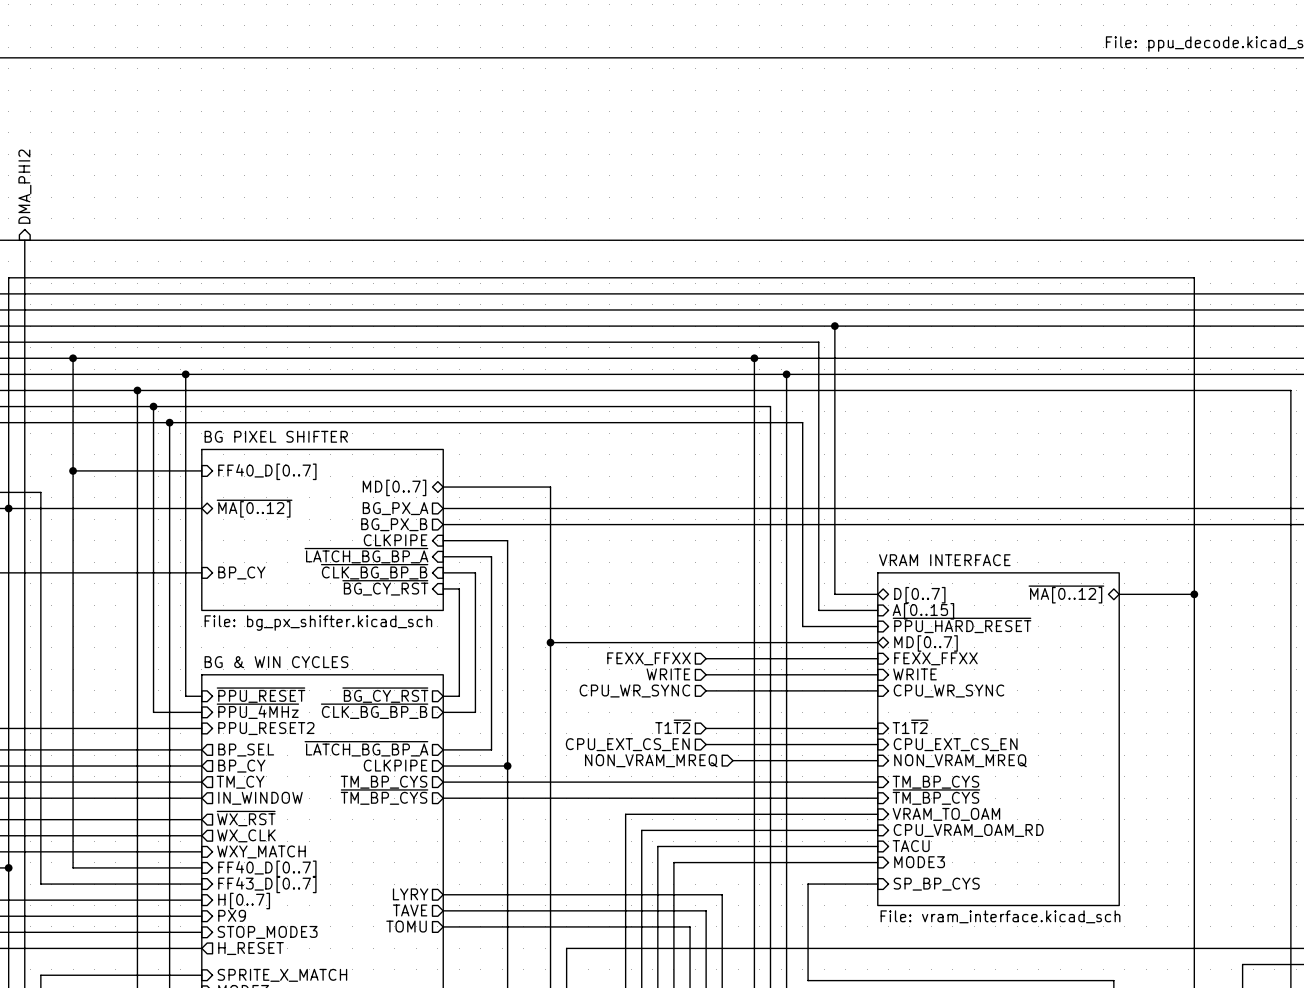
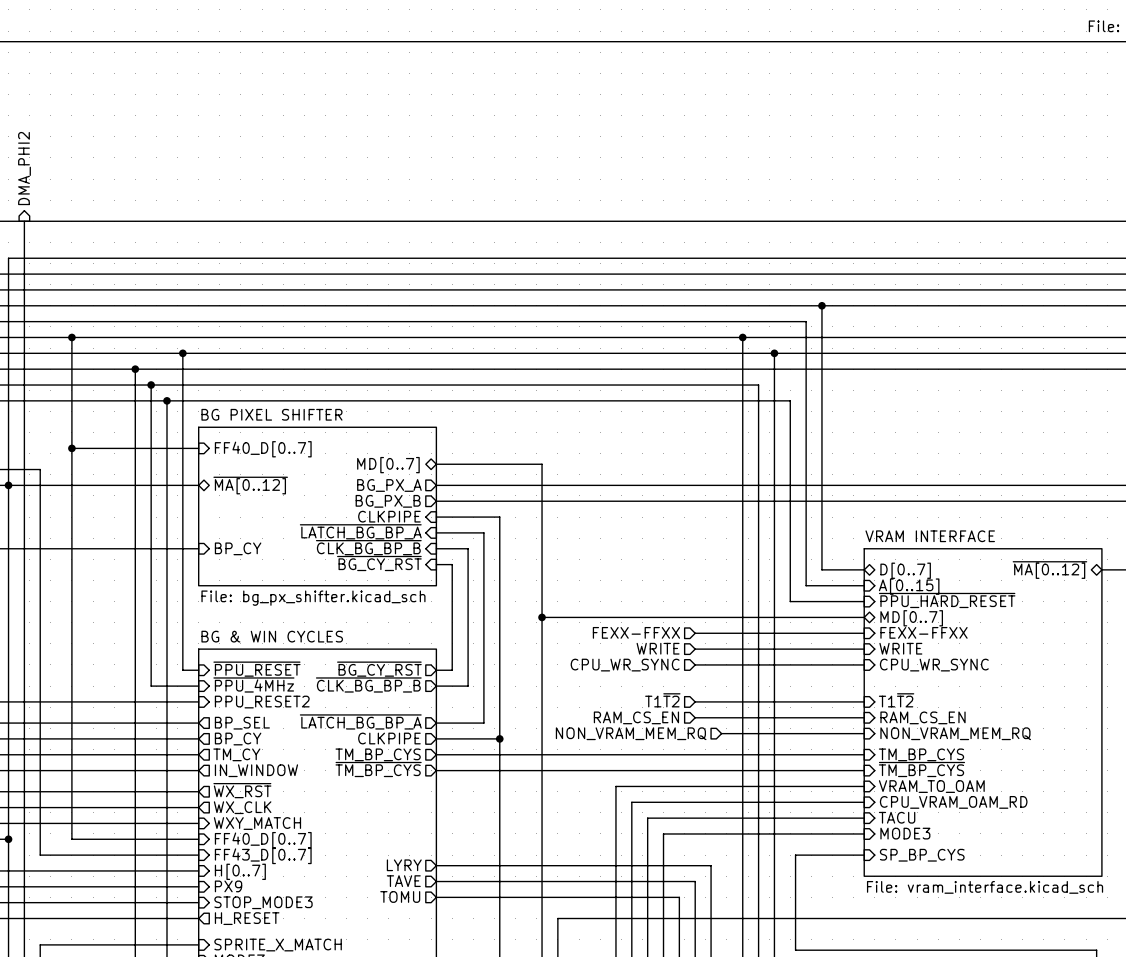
hierarchical label: FEXX_FFXX (648, 658) -> FEXX-FFXX (636, 632)
sheet pin: FEXX_FFXX (935, 658) -> FEXX-FFXX (924, 632)
hierarchical label: CPU_EXT_CS_EN (627, 744) -> RAM_CS_EN (636, 717)
sheet pin: CPU_EXT_CS_EN (955, 744) -> RAM_CS_EN (923, 717)
hierarchical label: NON_VRAM_MREQ (651, 760) -> NON_VRAM_MEM_RQ (631, 733)
sheet pin: NON_VRAM_MREQ (960, 760) -> NON_VRAM_MEM_RQ (955, 733)

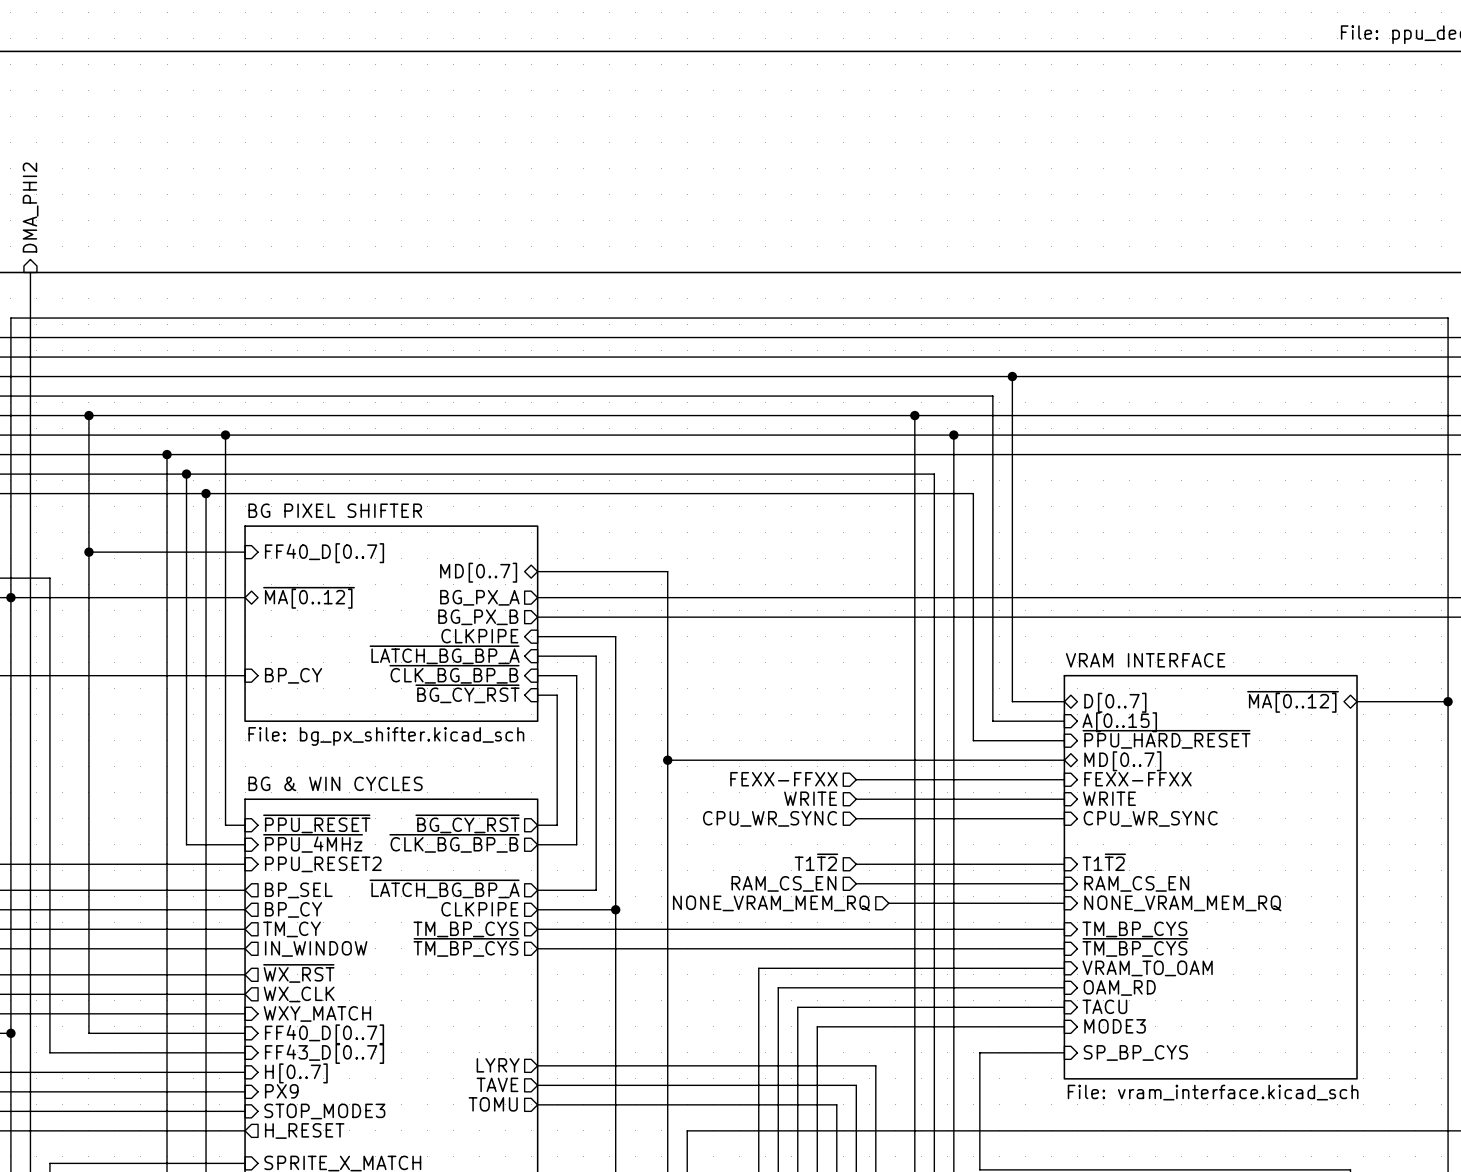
hierarchical label: NON_VRAM_MEM_RQ (631, 733) -> NONE_VRAM_MEM_RQ (771, 903)
sheet pin: NON_VRAM_MEM_RQ (955, 733) -> NONE_VRAM_MEM_RQ (1182, 903)
sheet pin: CPU_VRAM_OAM_RD (953, 802) -> OAM_RD (1119, 987)

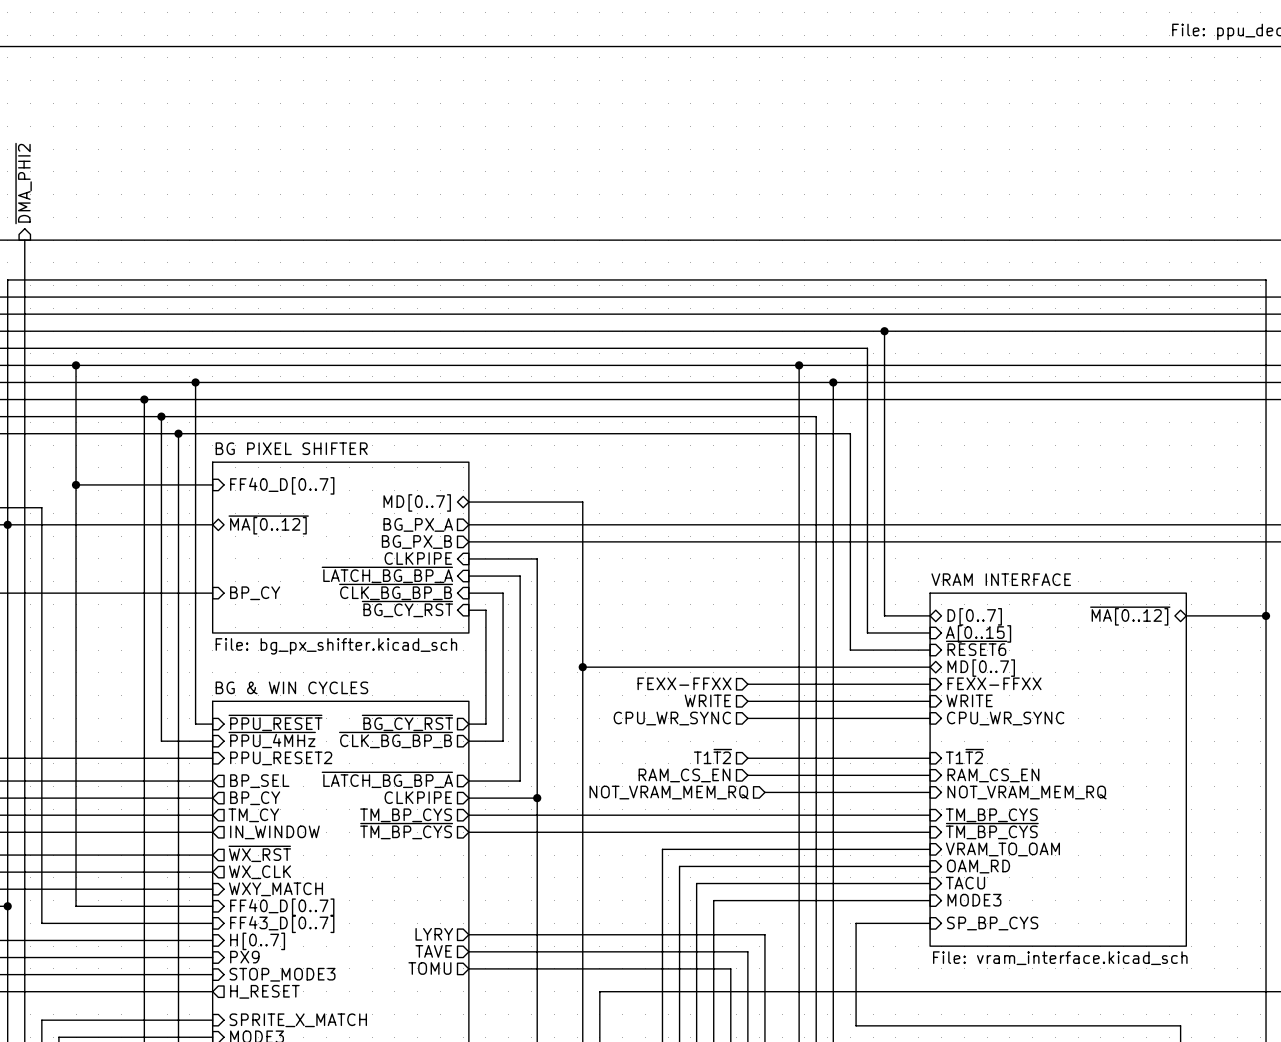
sheet pin: DMA_PHI2 (30, 207) -> ~{DMA_PHI2} (23, 183)
sheet pin: ~{PPU_HARD_RESET} (1166, 739) -> ~{RESET6} (976, 648)
hierarchical label: NONE_VRAM_MEM_RQ (771, 903) -> NOT_VRAM_MEM_RQ (669, 792)
wire: none -> (764, 792) (776, 792)
sheet pin: NONE_VRAM_MEM_RQ (1182, 903) -> NOT_VRAM_MEM_RQ (1027, 792)

